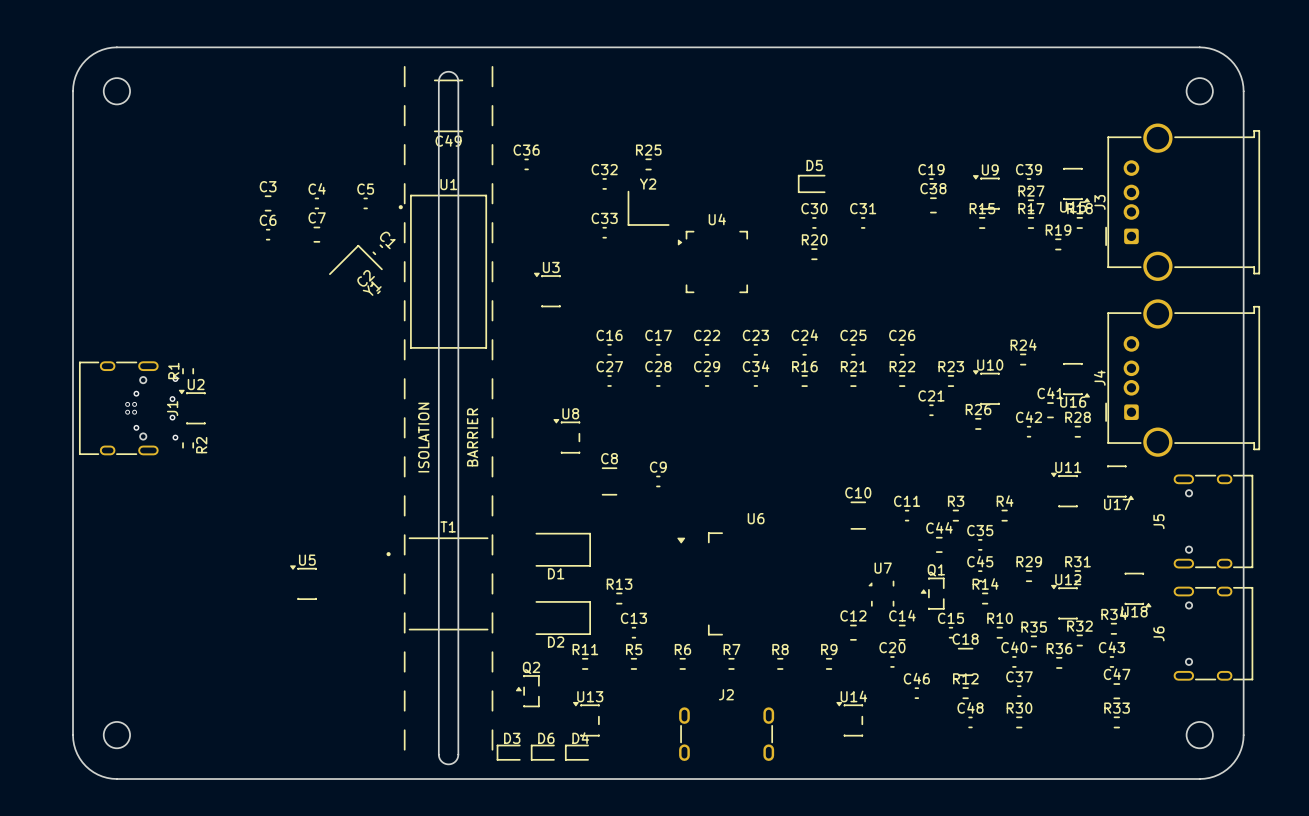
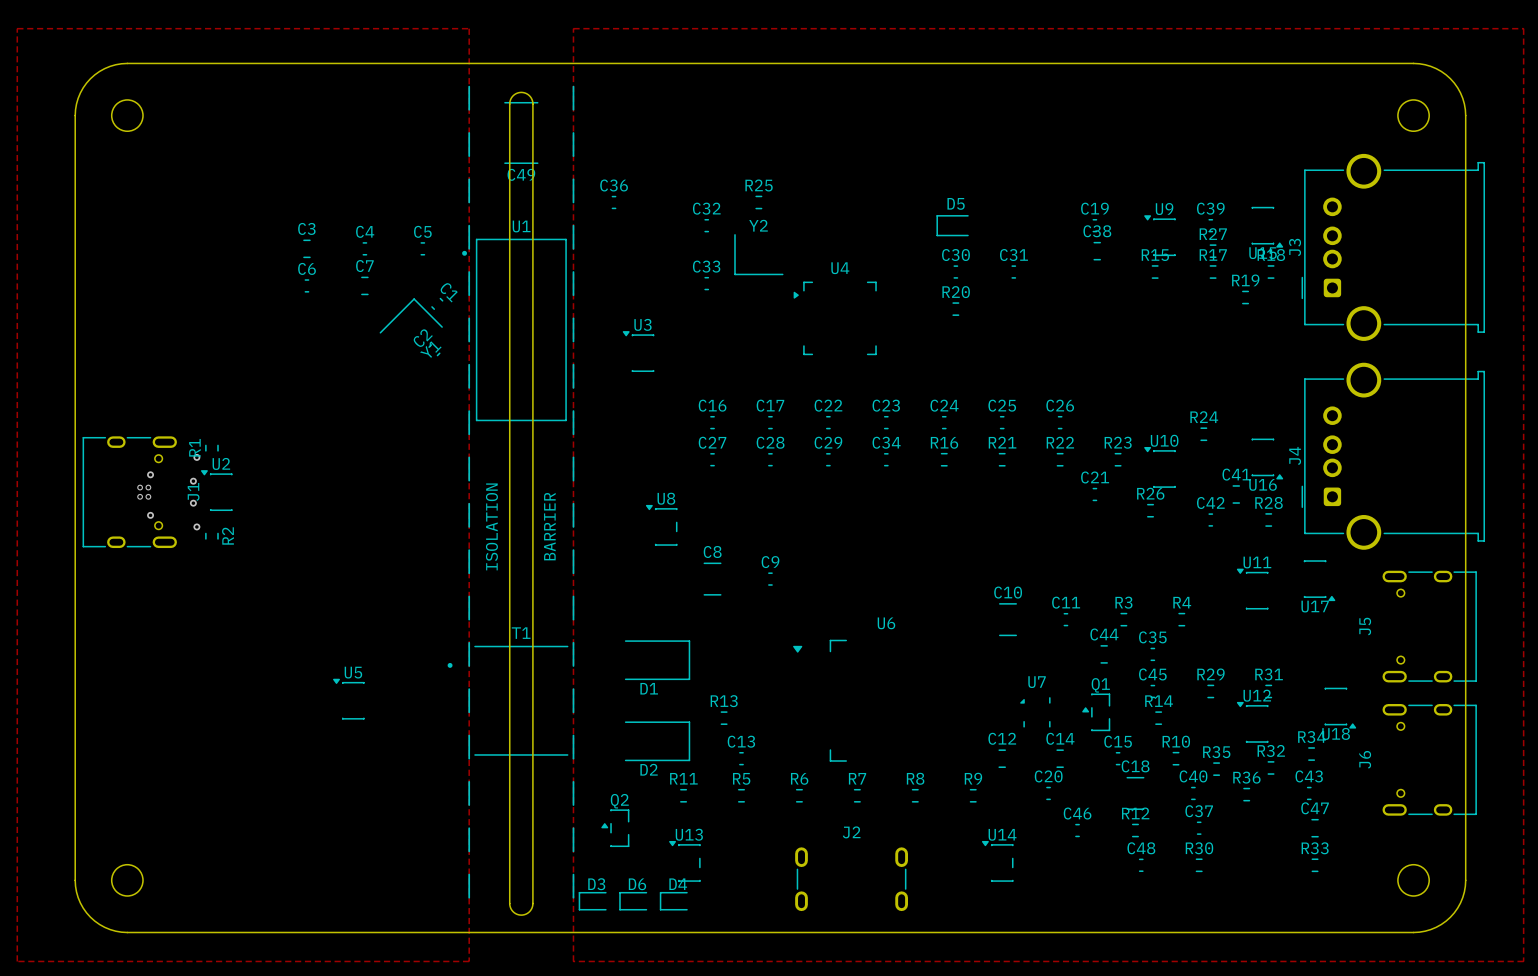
zone outline: none -> (17, 28) (469, 28) (469, 961) (17, 961) (17, 28)
zone outline: none -> (573, 28) (1523, 28) (1523, 961) (573, 961) (573, 28)

